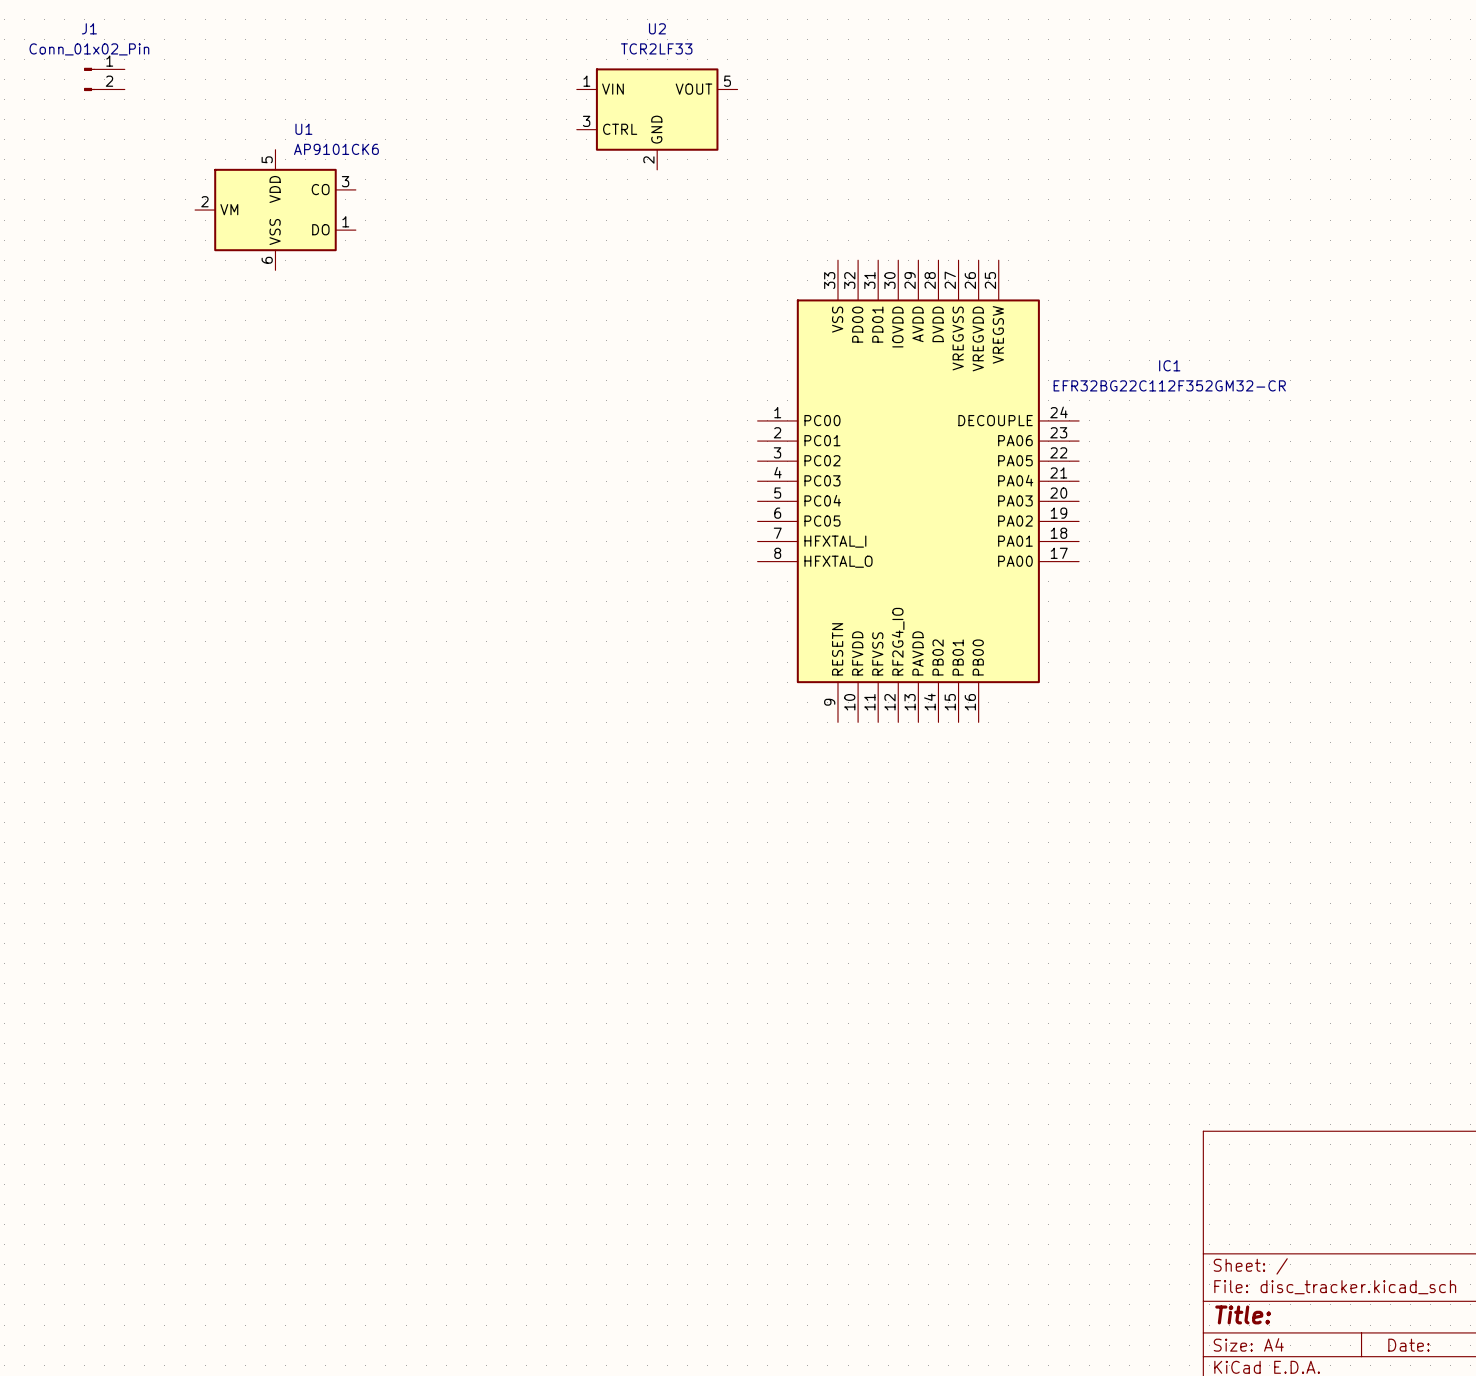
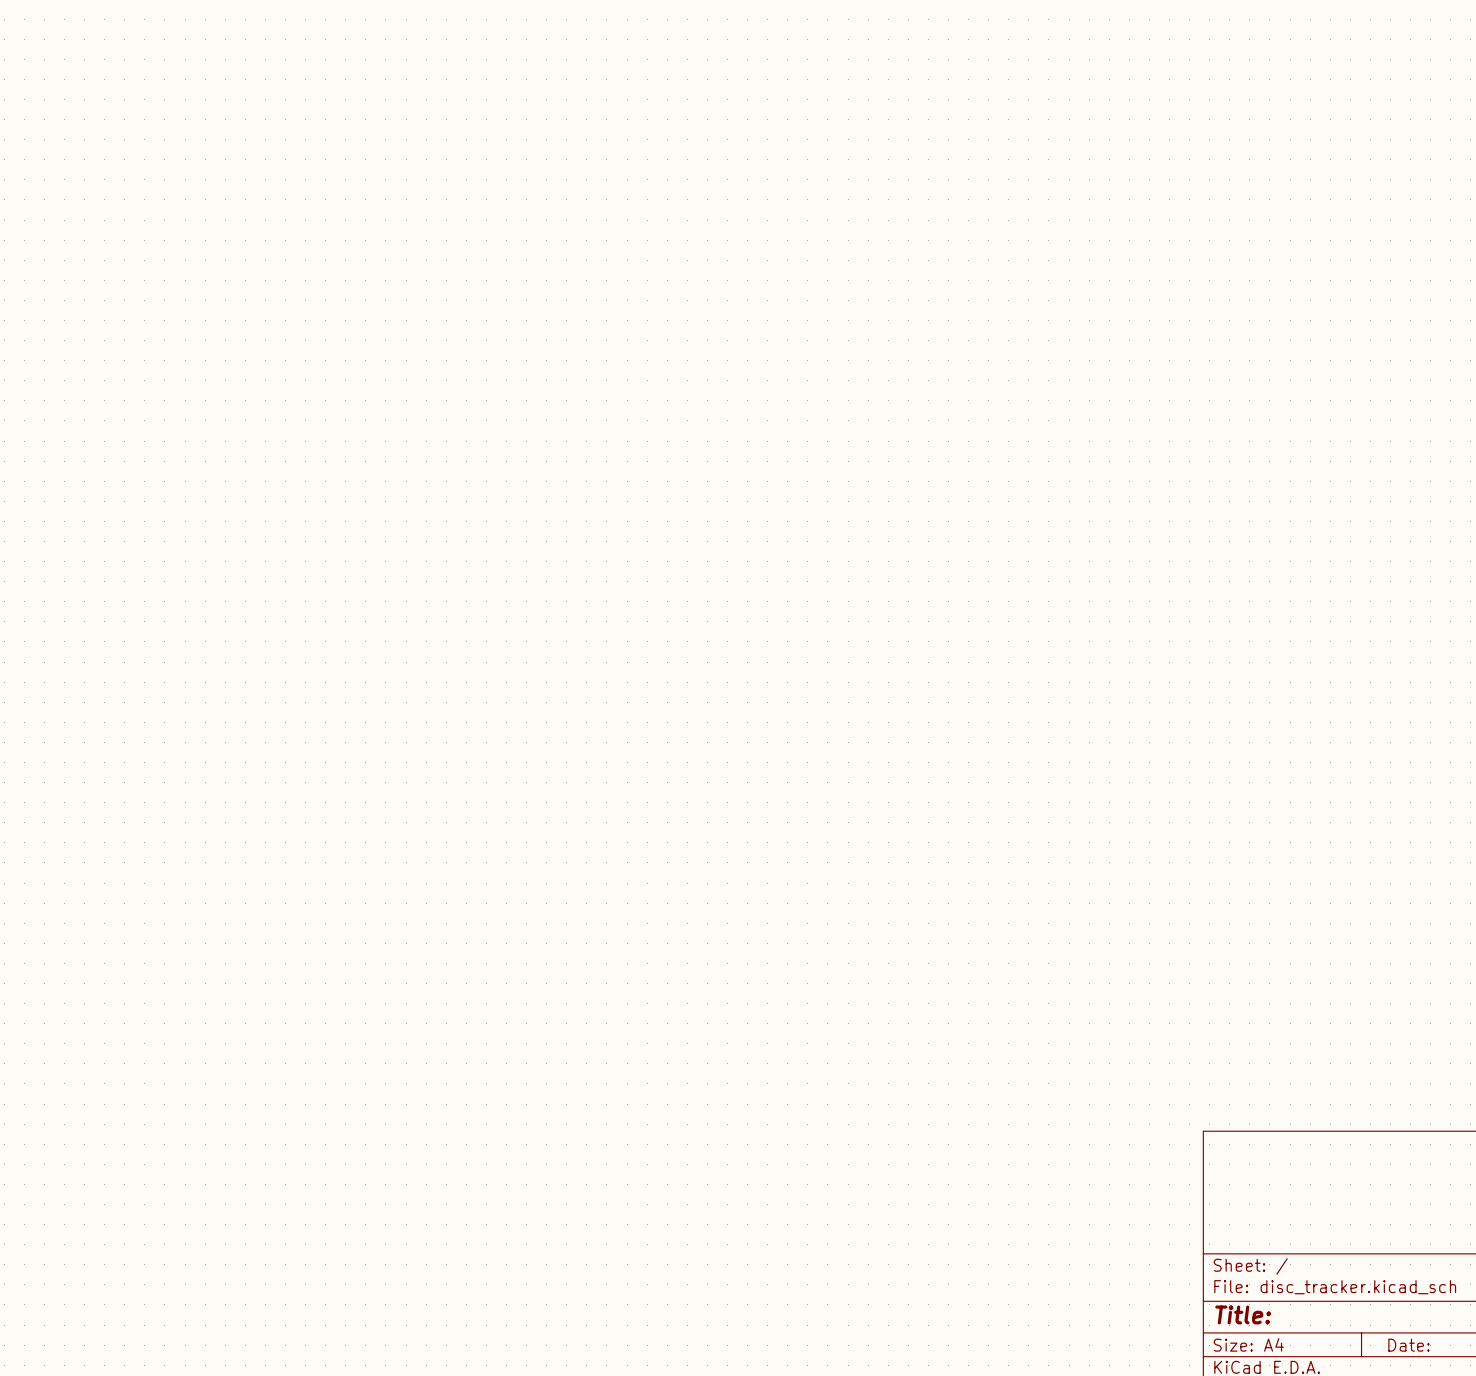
J1: Conn_01x02_Pin (104, 79) -> none
U2: TCR2LF33 (657, 119) -> none
U1: AP9101CK6 (275, 210) -> none
IC1: EFR32BG22C112F352GM32-CR (918, 491) -> none

